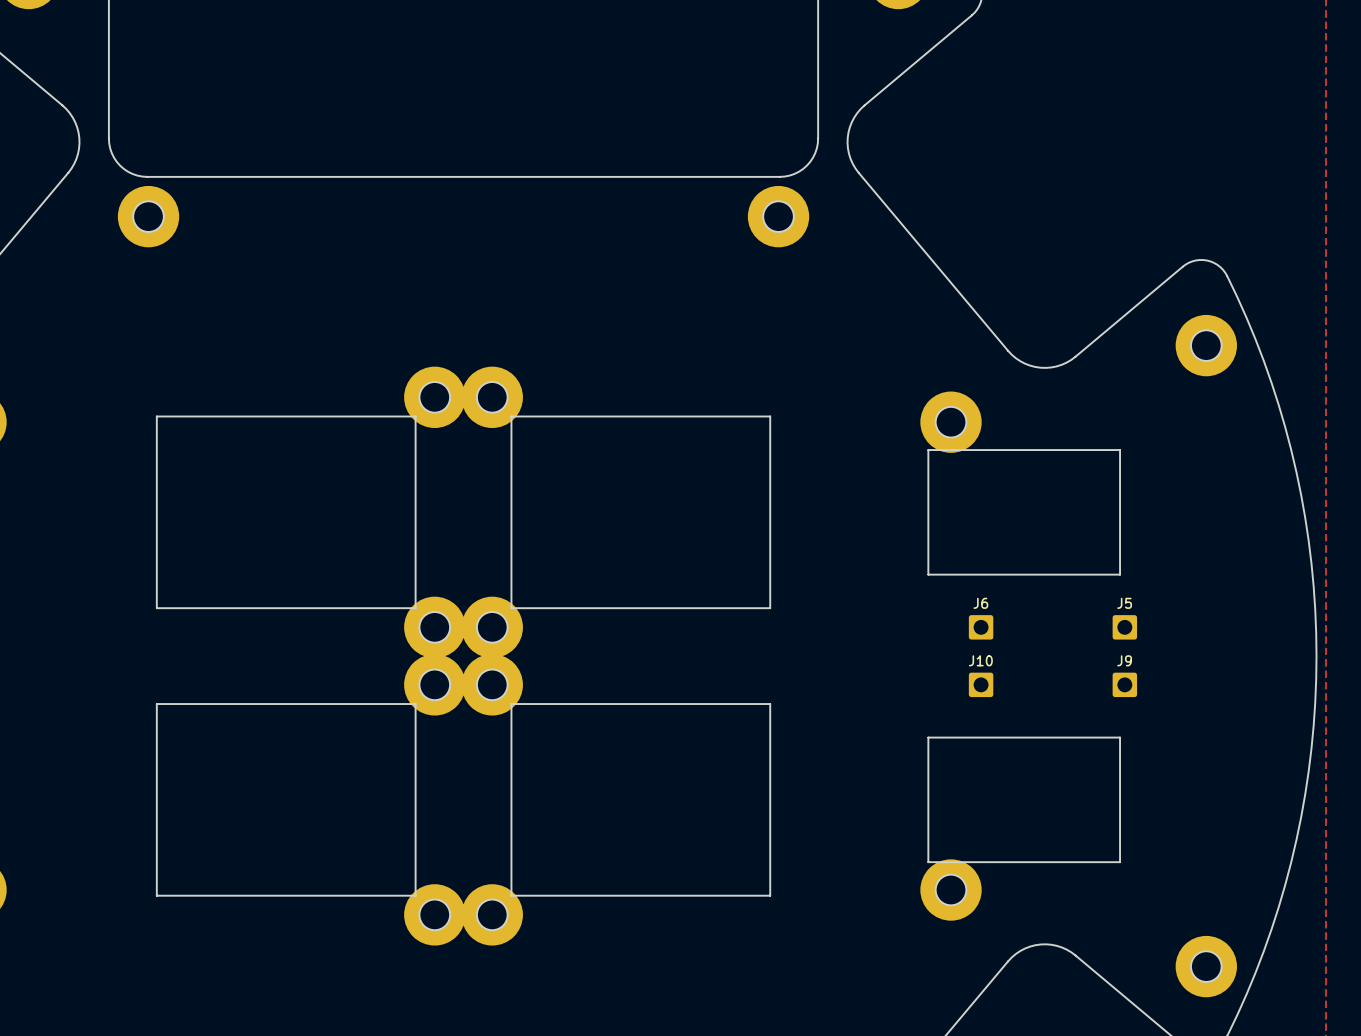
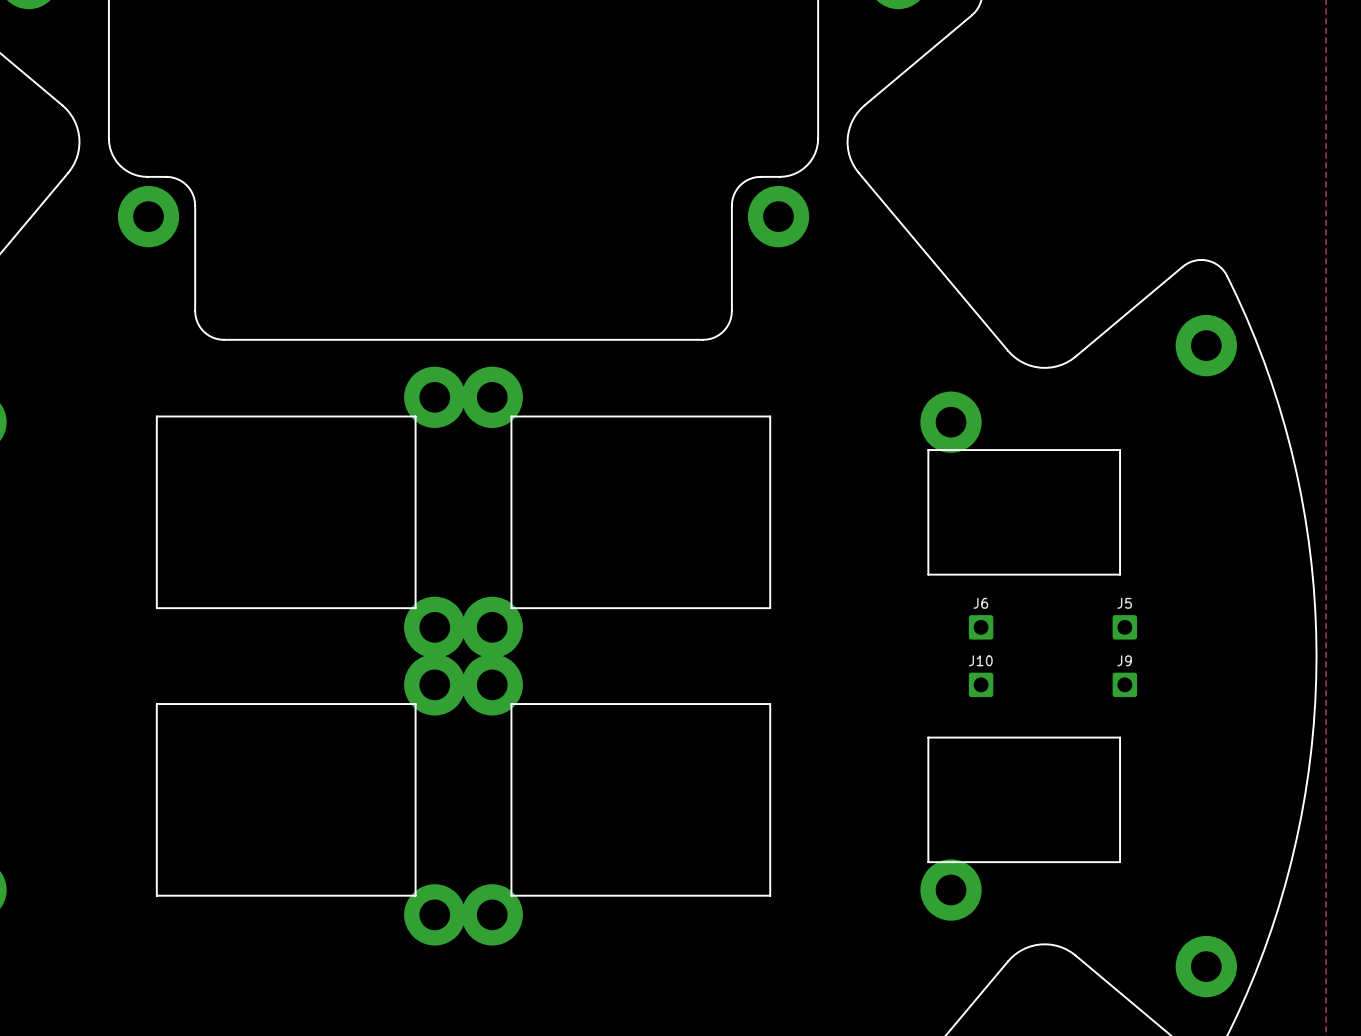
board edge: (166, 176) (760, 176) -> (166, 176) (183, 182) (194, 198) (195, 311) (197, 322) (209, 335) (223, 339) (710, 338) (723, 331) (731, 314) (732, 198) (743, 182) (760, 176)
round board edge: [132, 200, 165, 233] -> none
round board edge: [762, 200, 795, 233] -> none
round board edge: [1190, 329, 1223, 362] -> none
round board edge: [418, 381, 452, 414] -> none
round board edge: [475, 381, 509, 414] -> none
round board edge: [934, 405, 968, 439] -> none
round board edge: [418, 611, 452, 644] -> none
round board edge: [475, 611, 509, 644] -> none
round board edge: [418, 668, 452, 702] -> none
round board edge: [475, 668, 509, 702] -> none
round board edge: [934, 873, 968, 907] -> none
round board edge: [418, 898, 452, 932] -> none
round board edge: [475, 898, 509, 932] -> none
round board edge: [1190, 950, 1223, 983] -> none

